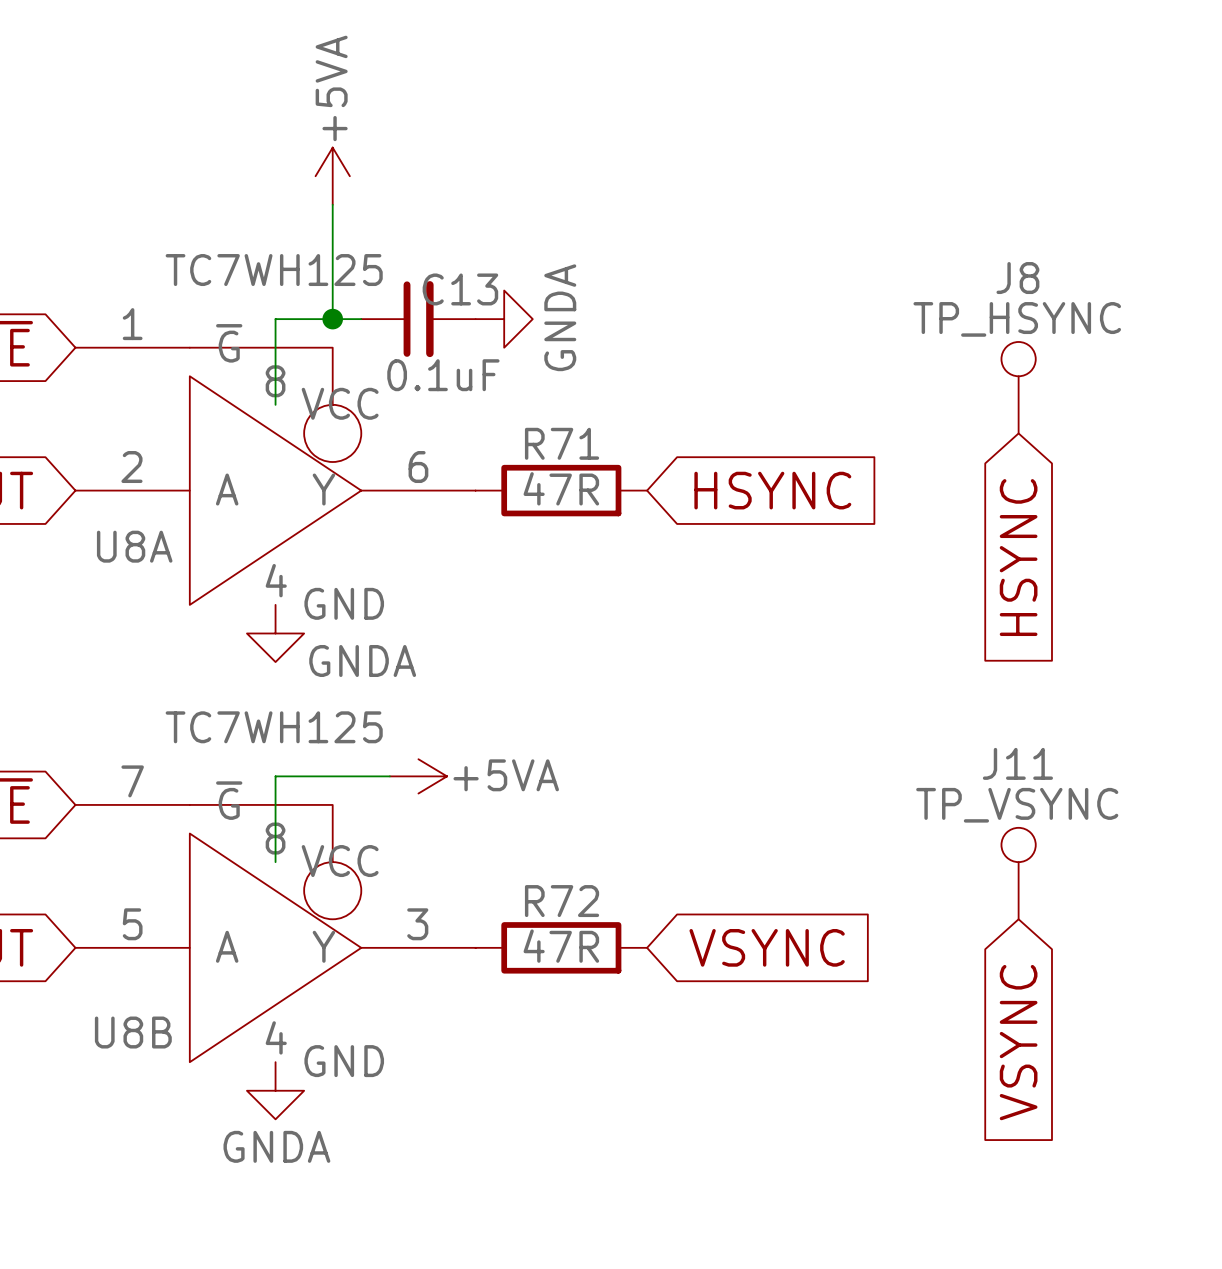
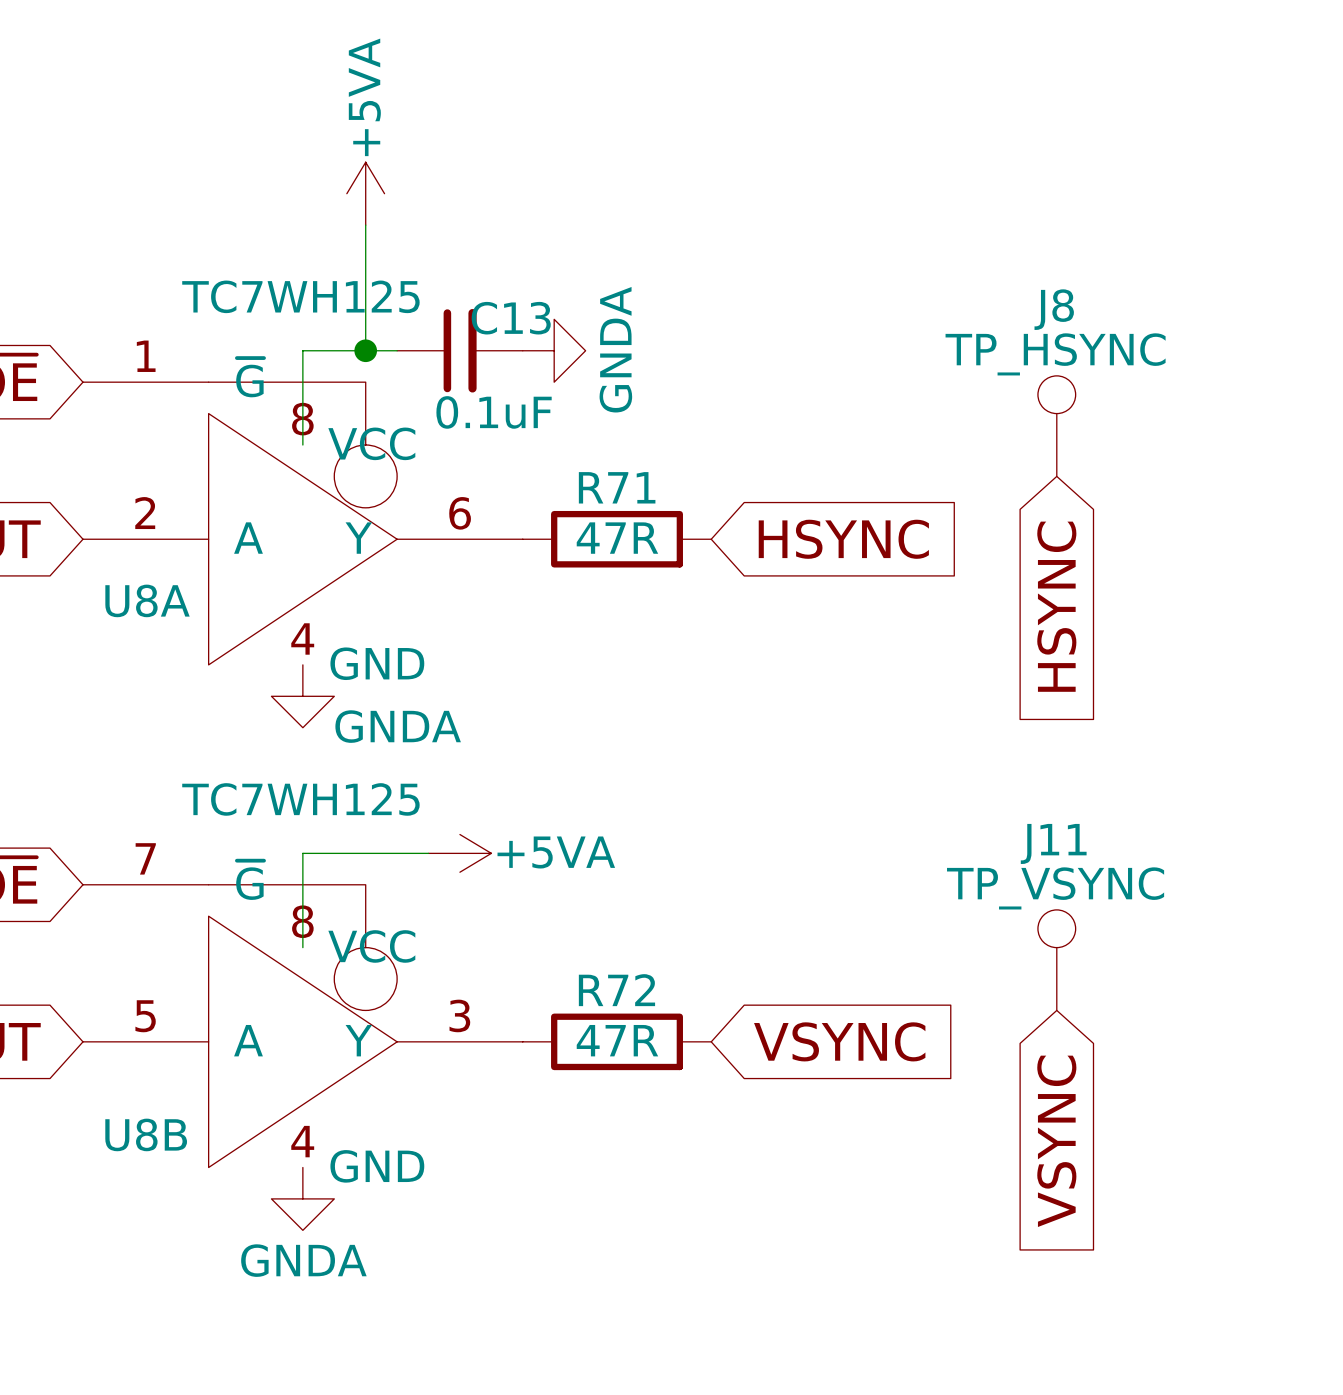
J8 position: (1018, 387) -> (1056, 426)
global label position: HSYNC (1018, 557) -> HSYNC (1056, 606)
J11 position: (1018, 873) -> (1056, 960)
global label position: VSYNC (1018, 1042) -> VSYNC (1056, 1141)

